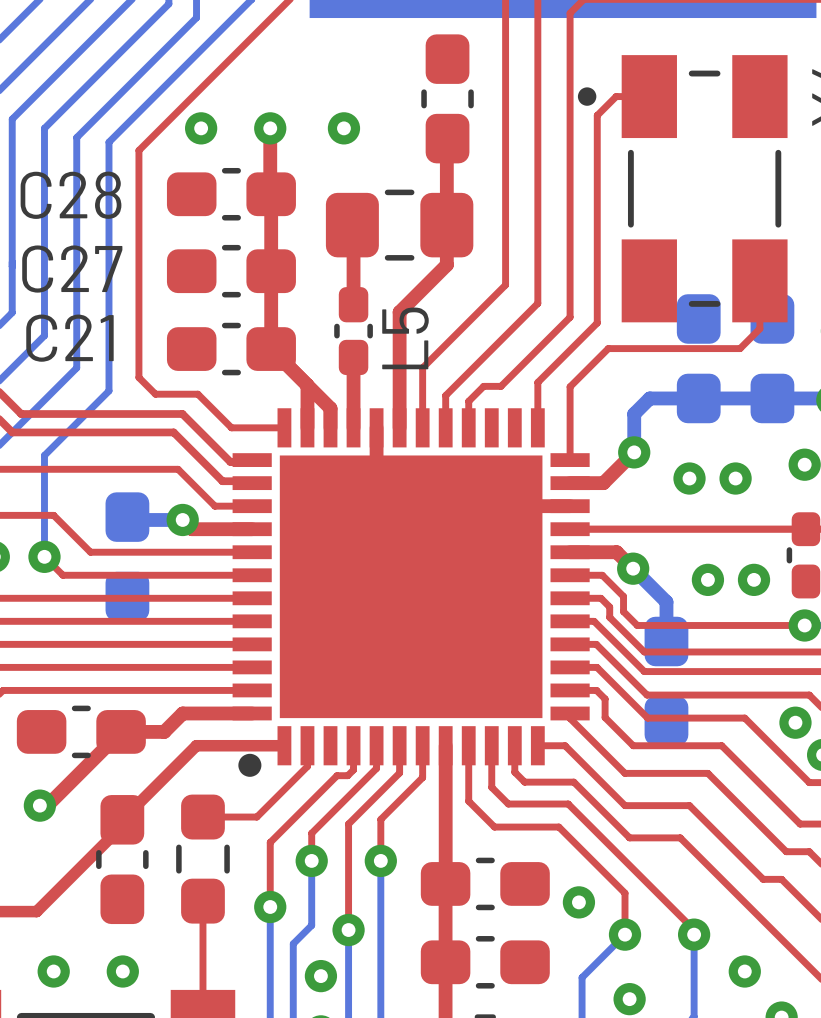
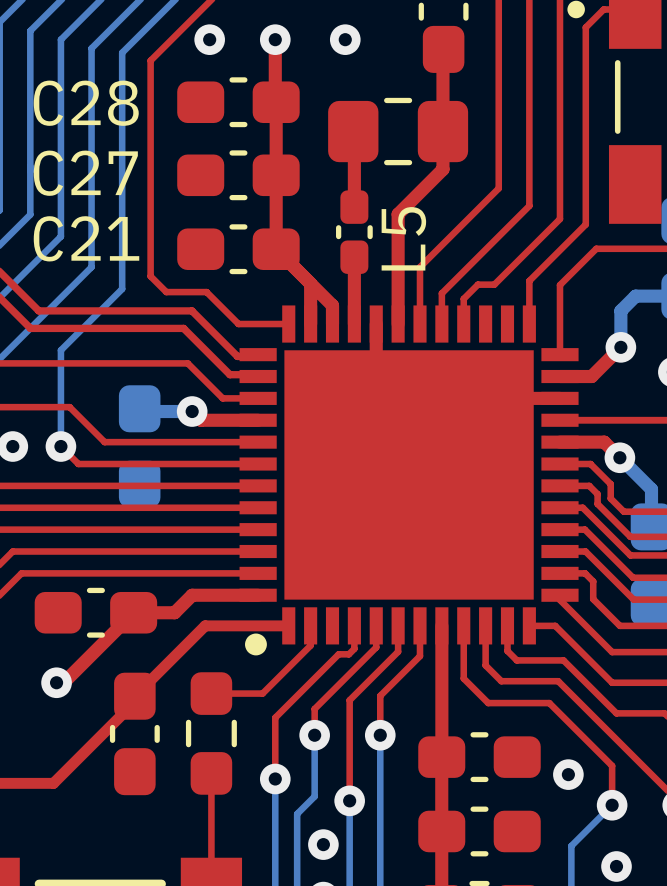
via: (53, 971) -> none
via: (122, 971) -> none

